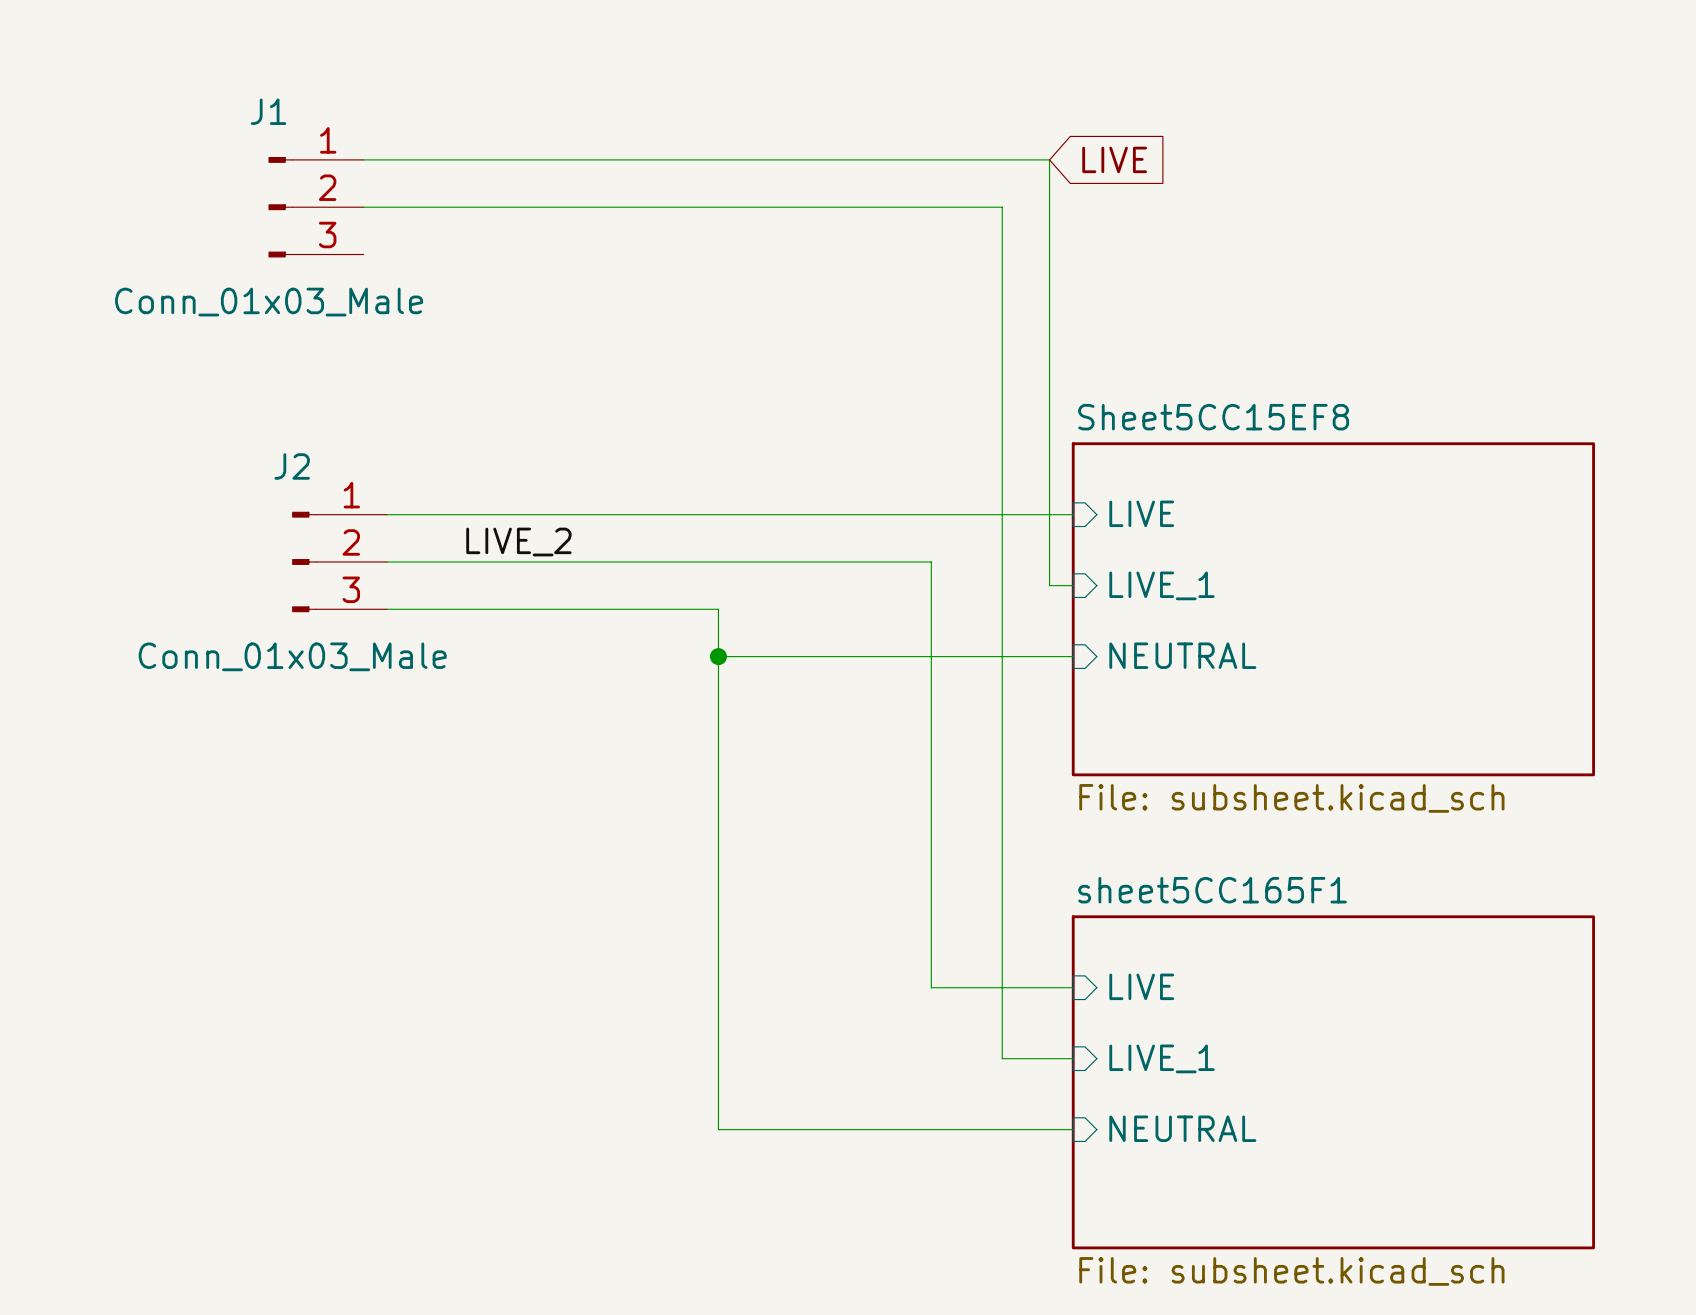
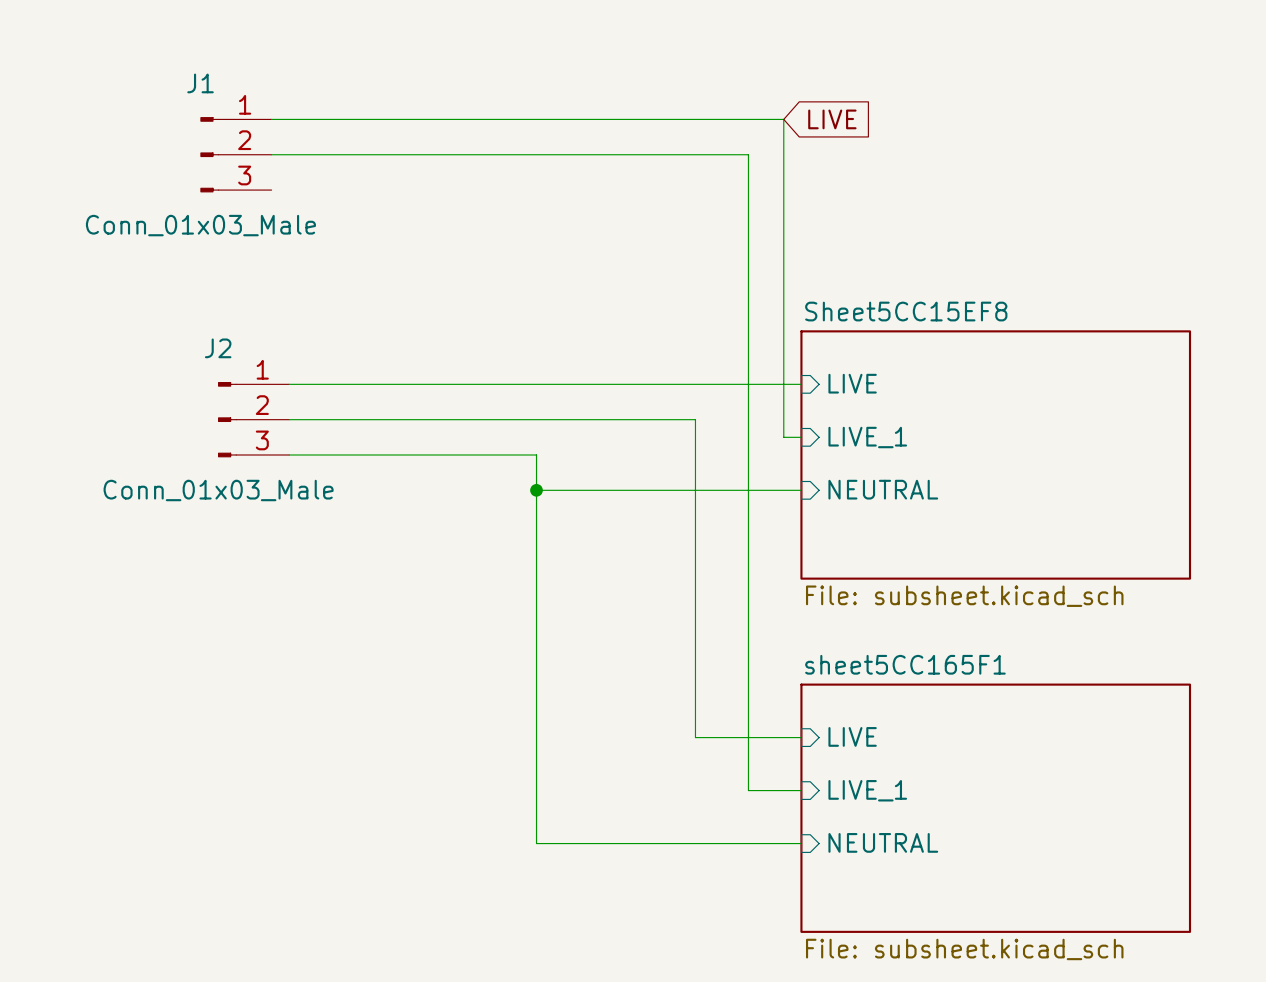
label: LIVE_2 (518, 542) -> none

